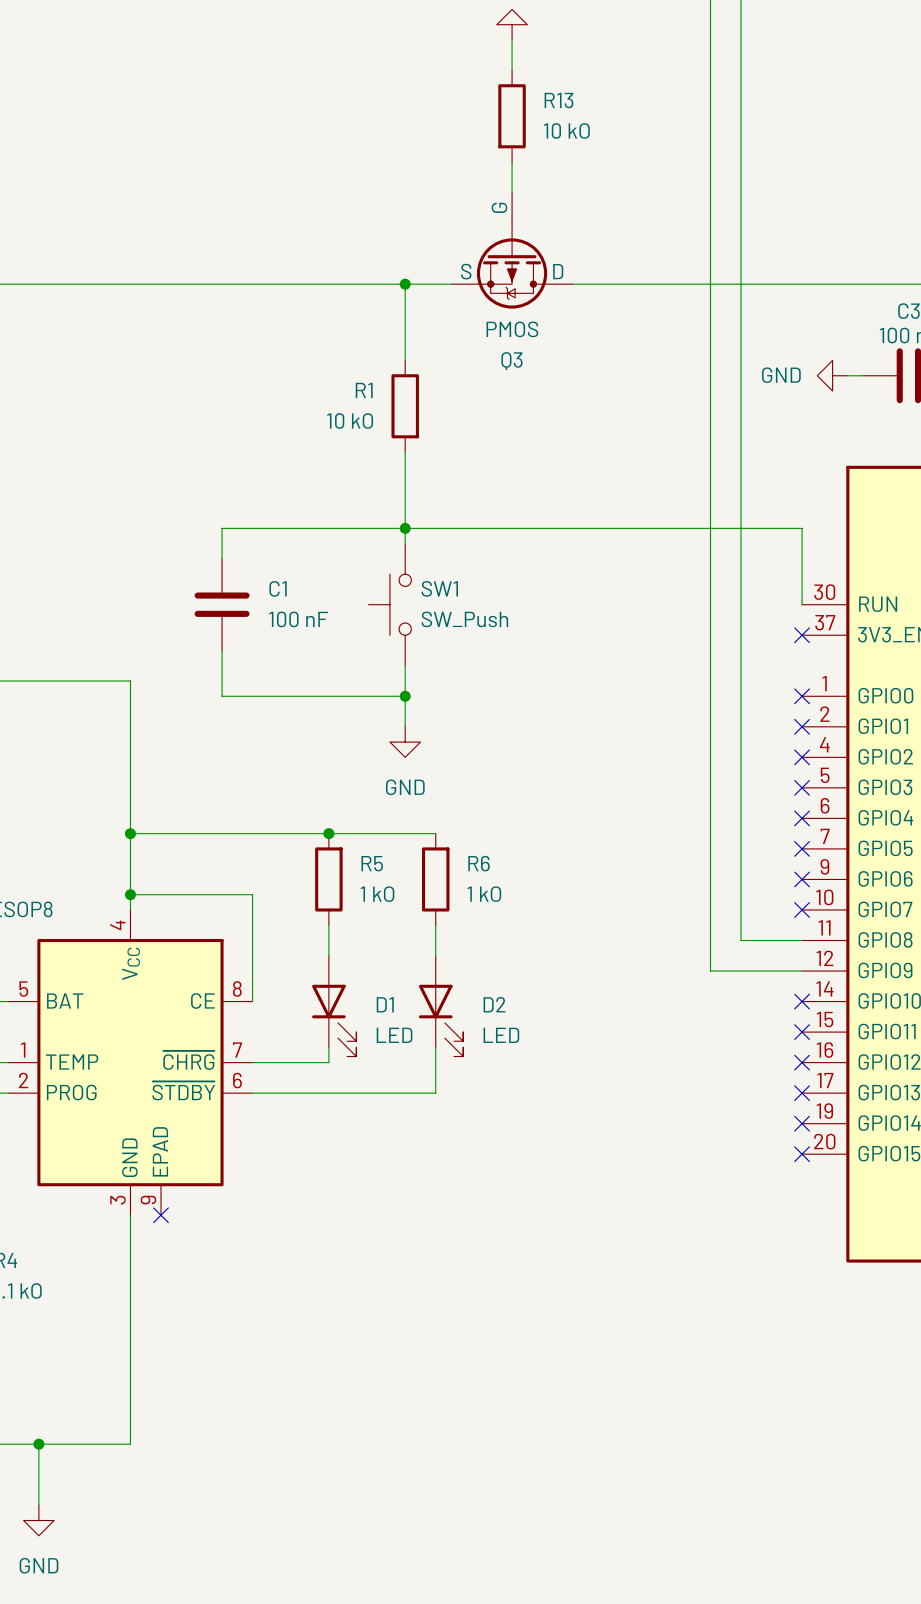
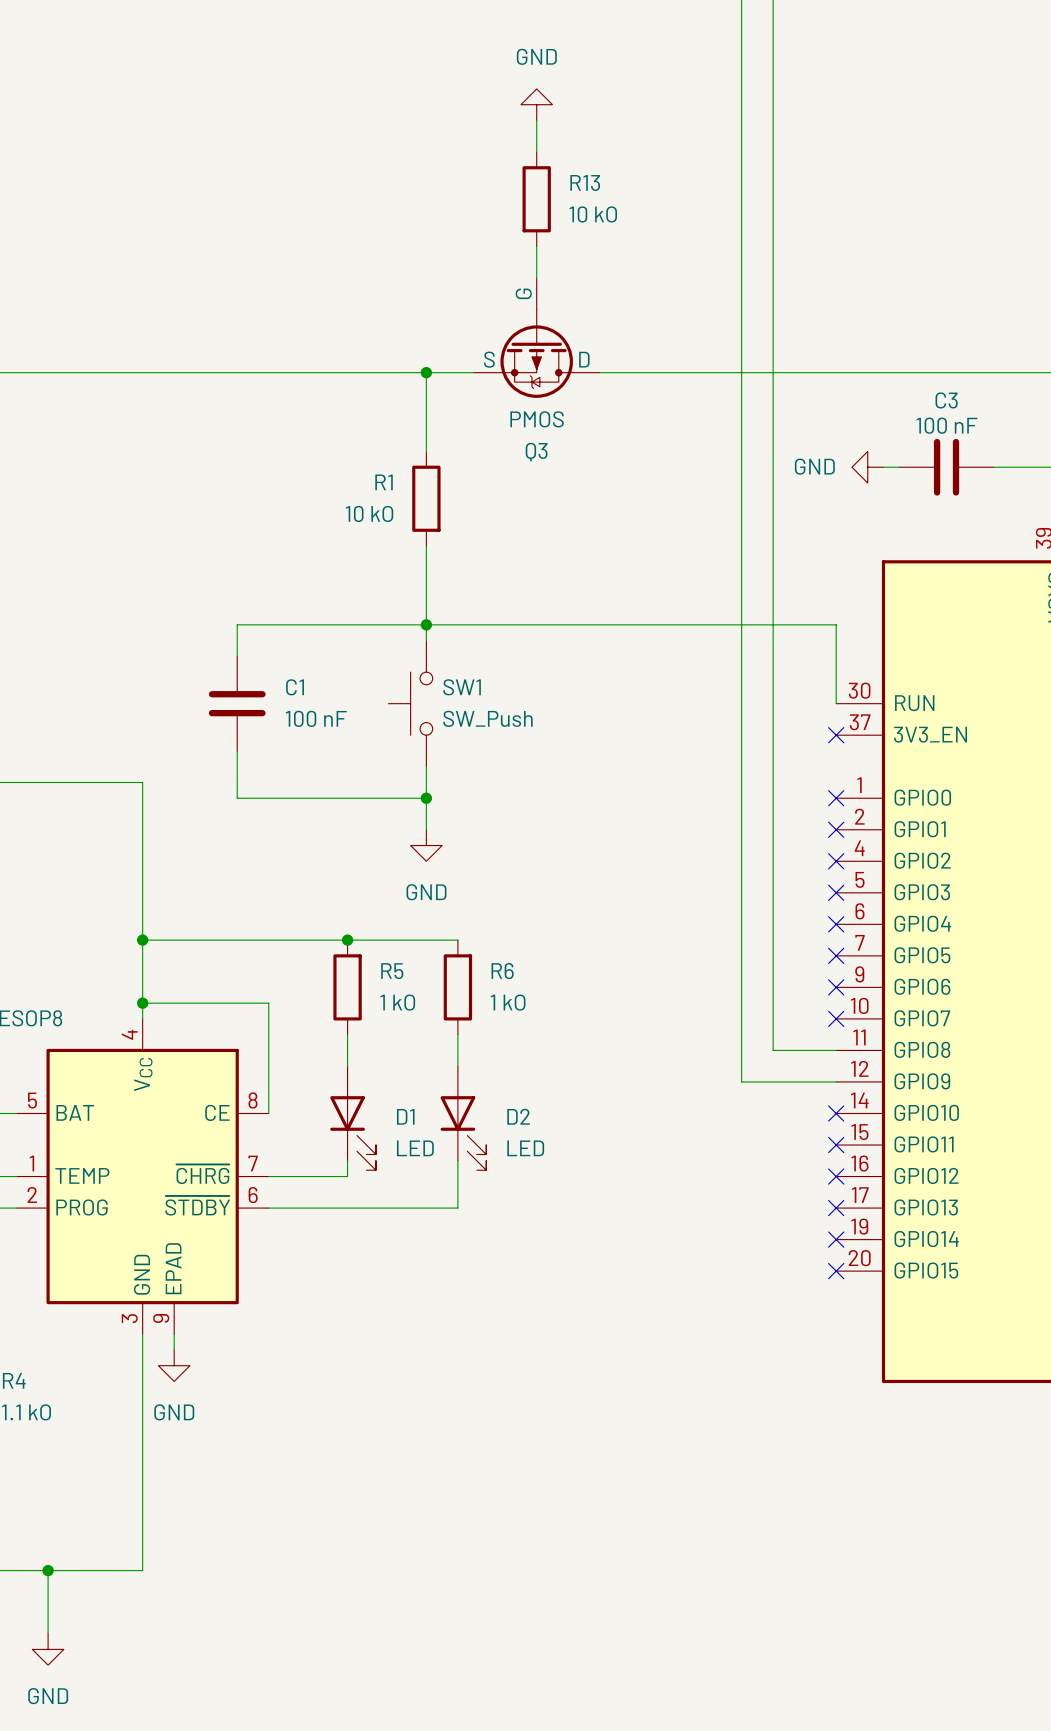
wire: none -> (174, 1334) (174, 1349)
no-connect mark: (160, 1215) -> none
power symbol: none -> GND (174, 1365)

